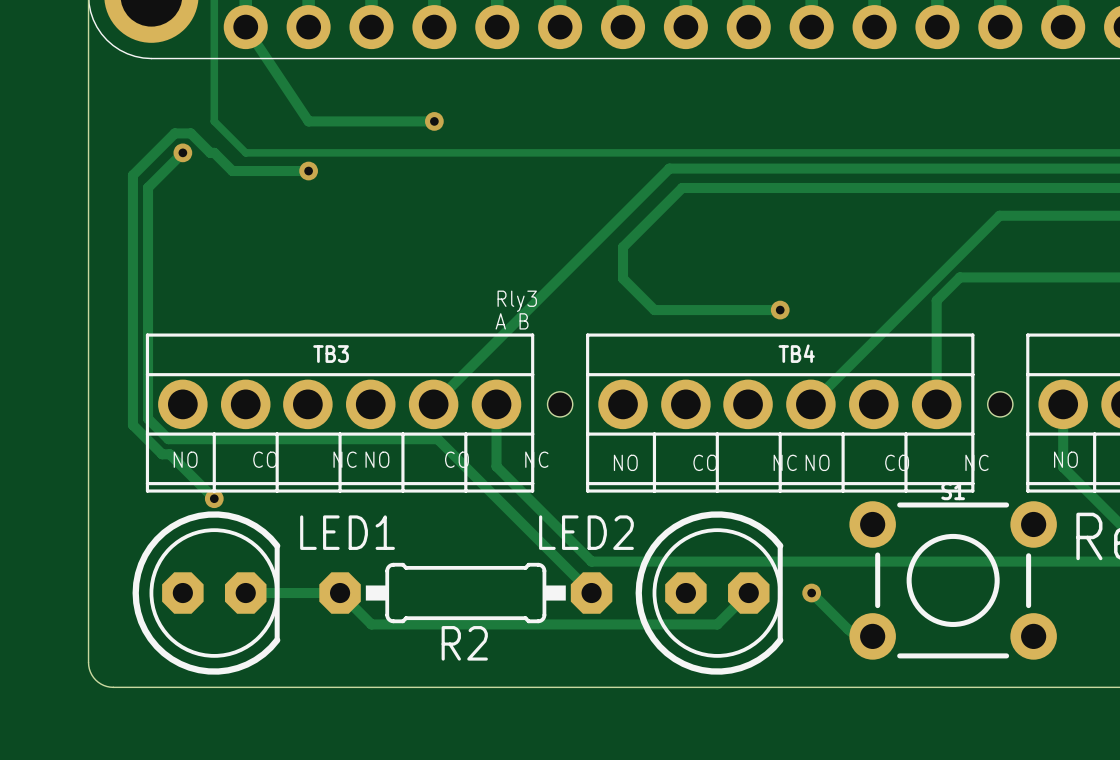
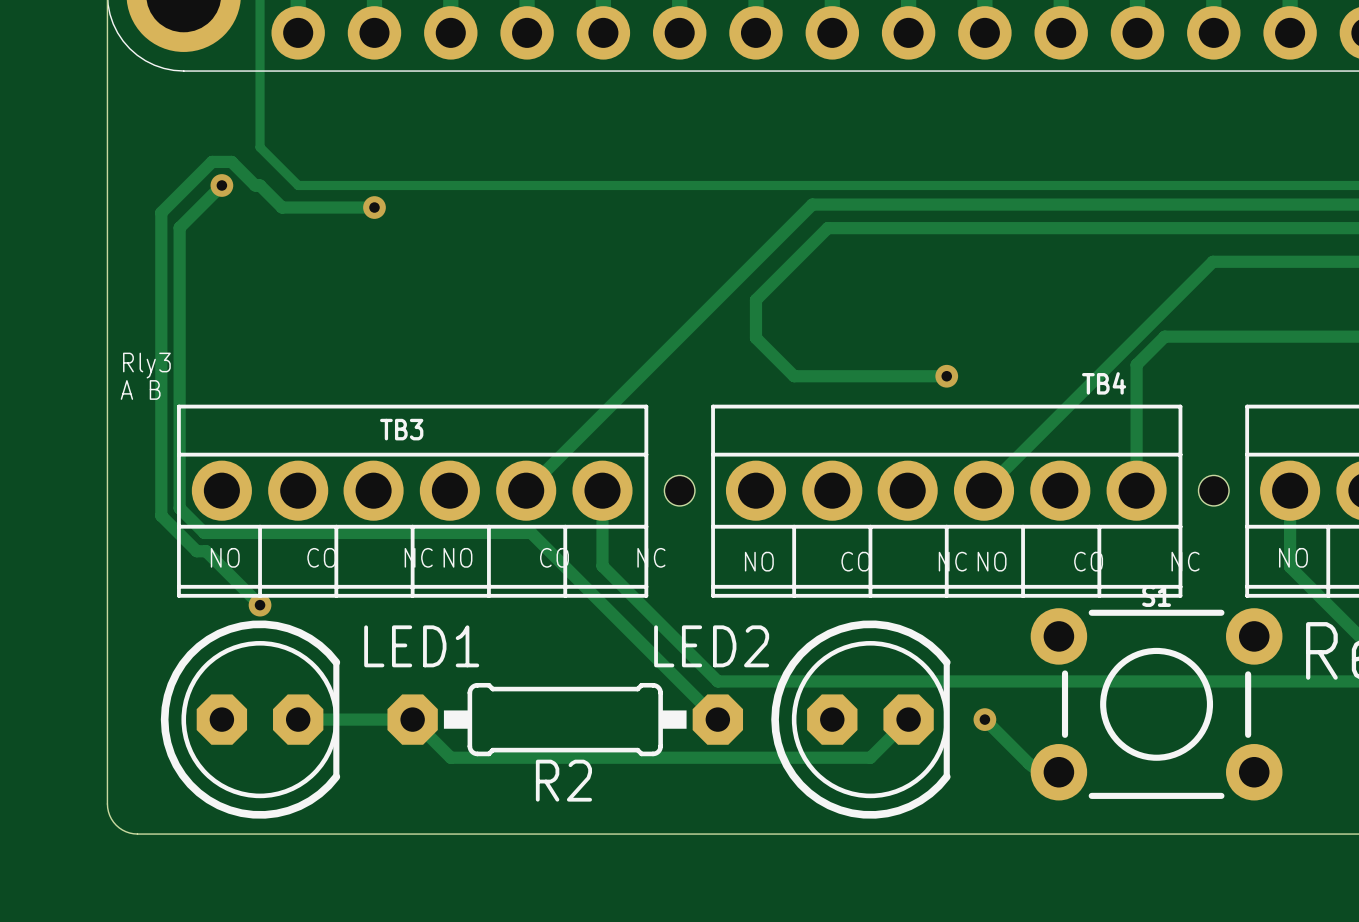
track: (245, 27) (308, 121) (434, 121) -> none
via: (434, 121) -> none
text position: Rly3 (517, 301) -> Rly3 (146, 365)
text position: A B (512, 321) -> A B (140, 389)
TB4 name position: TB4 (796, 353) -> TB4 (1104, 383)

